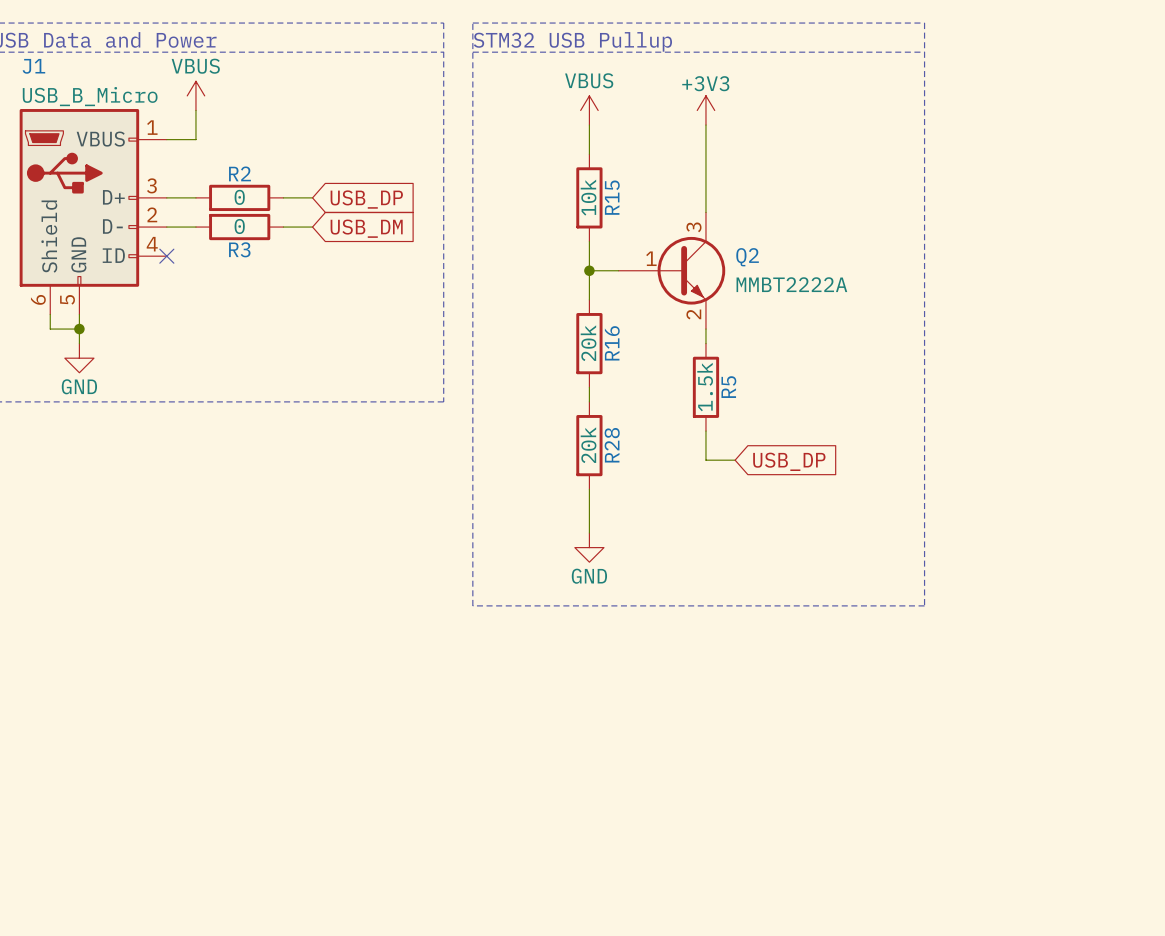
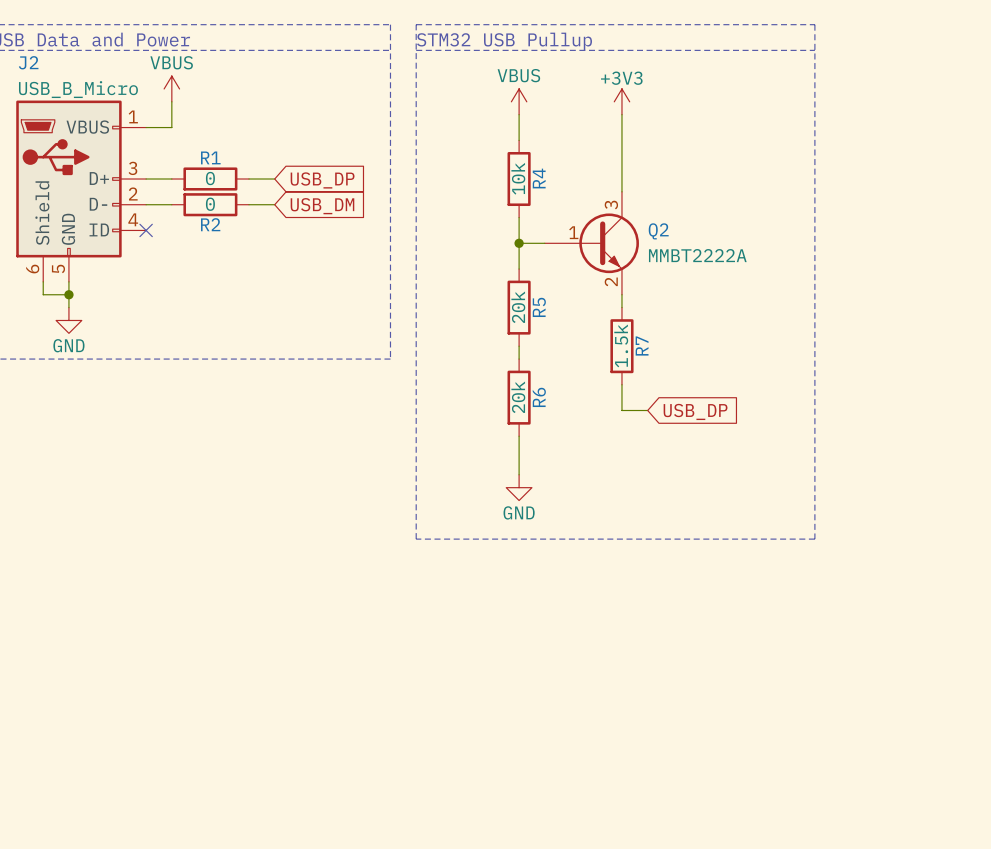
J1 name: J1 (33, 66) -> J2 (28, 62)
R2 name: R2 (239, 173) -> R1 (210, 157)
R15 name: R15 (612, 197) -> R4 (539, 178)
R3 name: R3 (239, 249) -> R2 (210, 224)
R16 name: R16 (612, 343) -> R5 (539, 307)
R5 name: R5 (728, 387) -> R7 (642, 346)
R28 name: R28 (612, 445) -> R6 (539, 397)

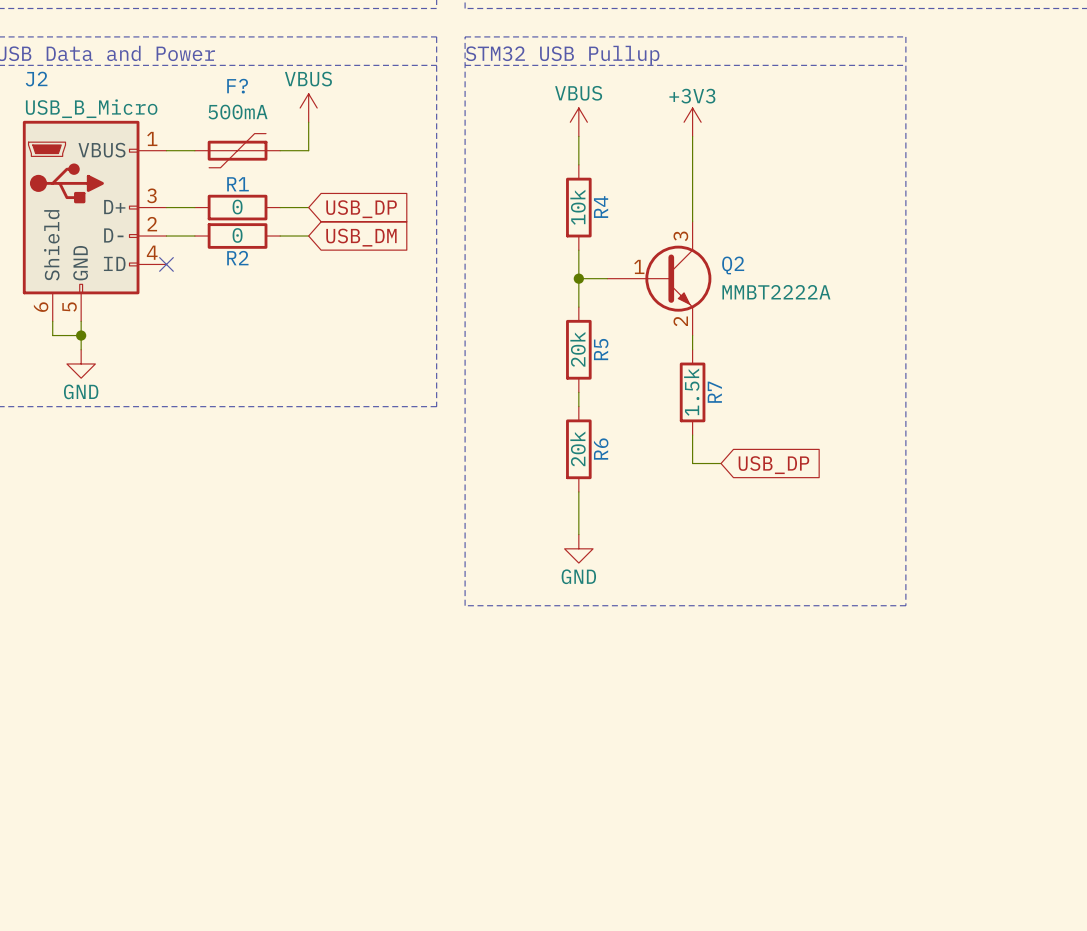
power symbol position: VBUS (171, 88) -> VBUS (308, 108)
wire: (171, 101) (171, 127) -> none
wire: none -> (308, 122) (308, 150) (280, 150)
F?: none -> 500mA (237, 150)

